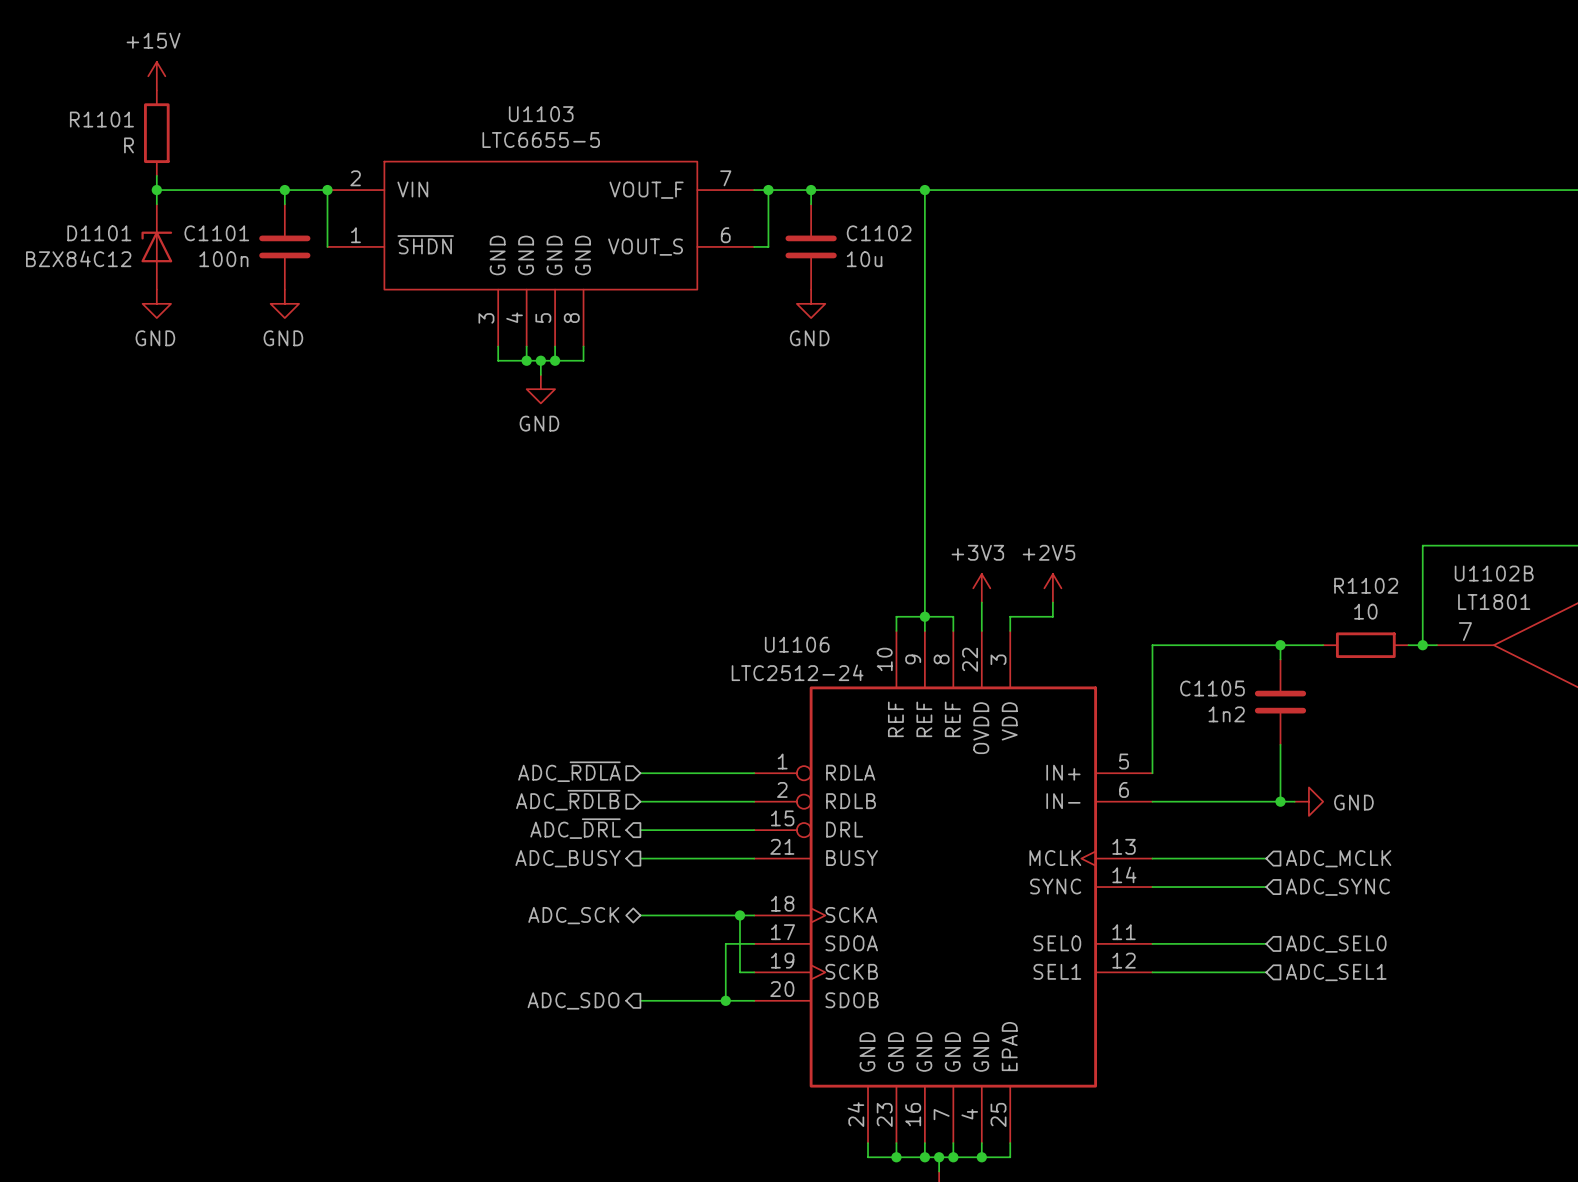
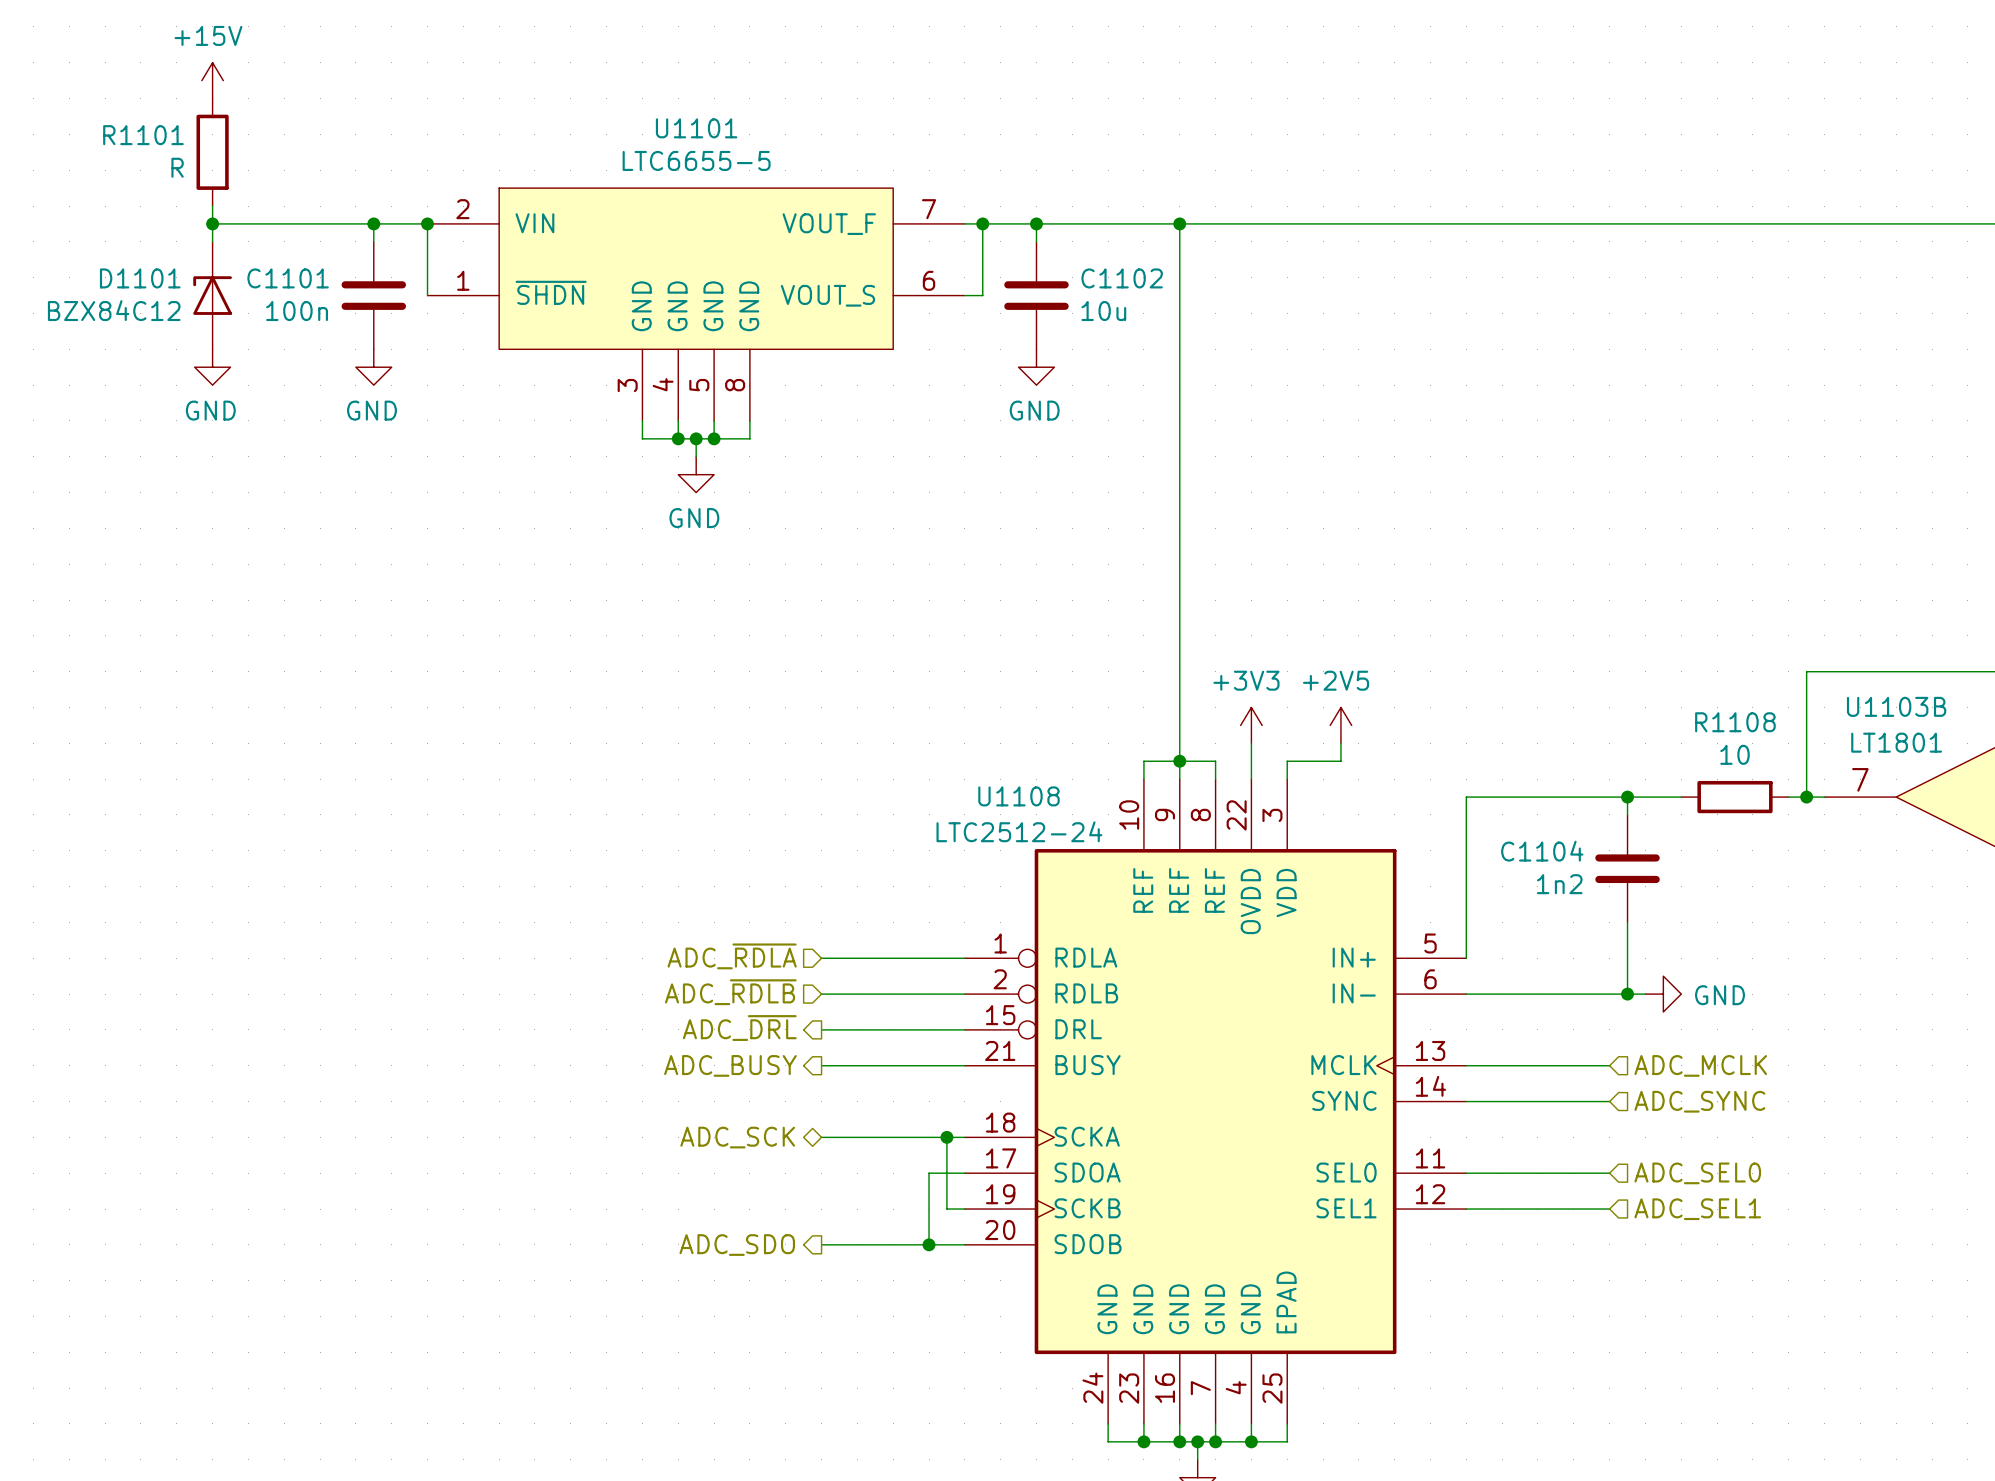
U1103 name: U1103 (541, 114) -> U1101 (696, 128)
U1102B name: U1102B (1494, 573) -> U1103B (1896, 706)
R1102 name: R1102 (1366, 585) -> R1108 (1735, 722)
U1106 name: U1106 (797, 644) -> U1108 (1019, 796)
C1105 name: C1105 (1212, 688) -> C1104 (1542, 851)

